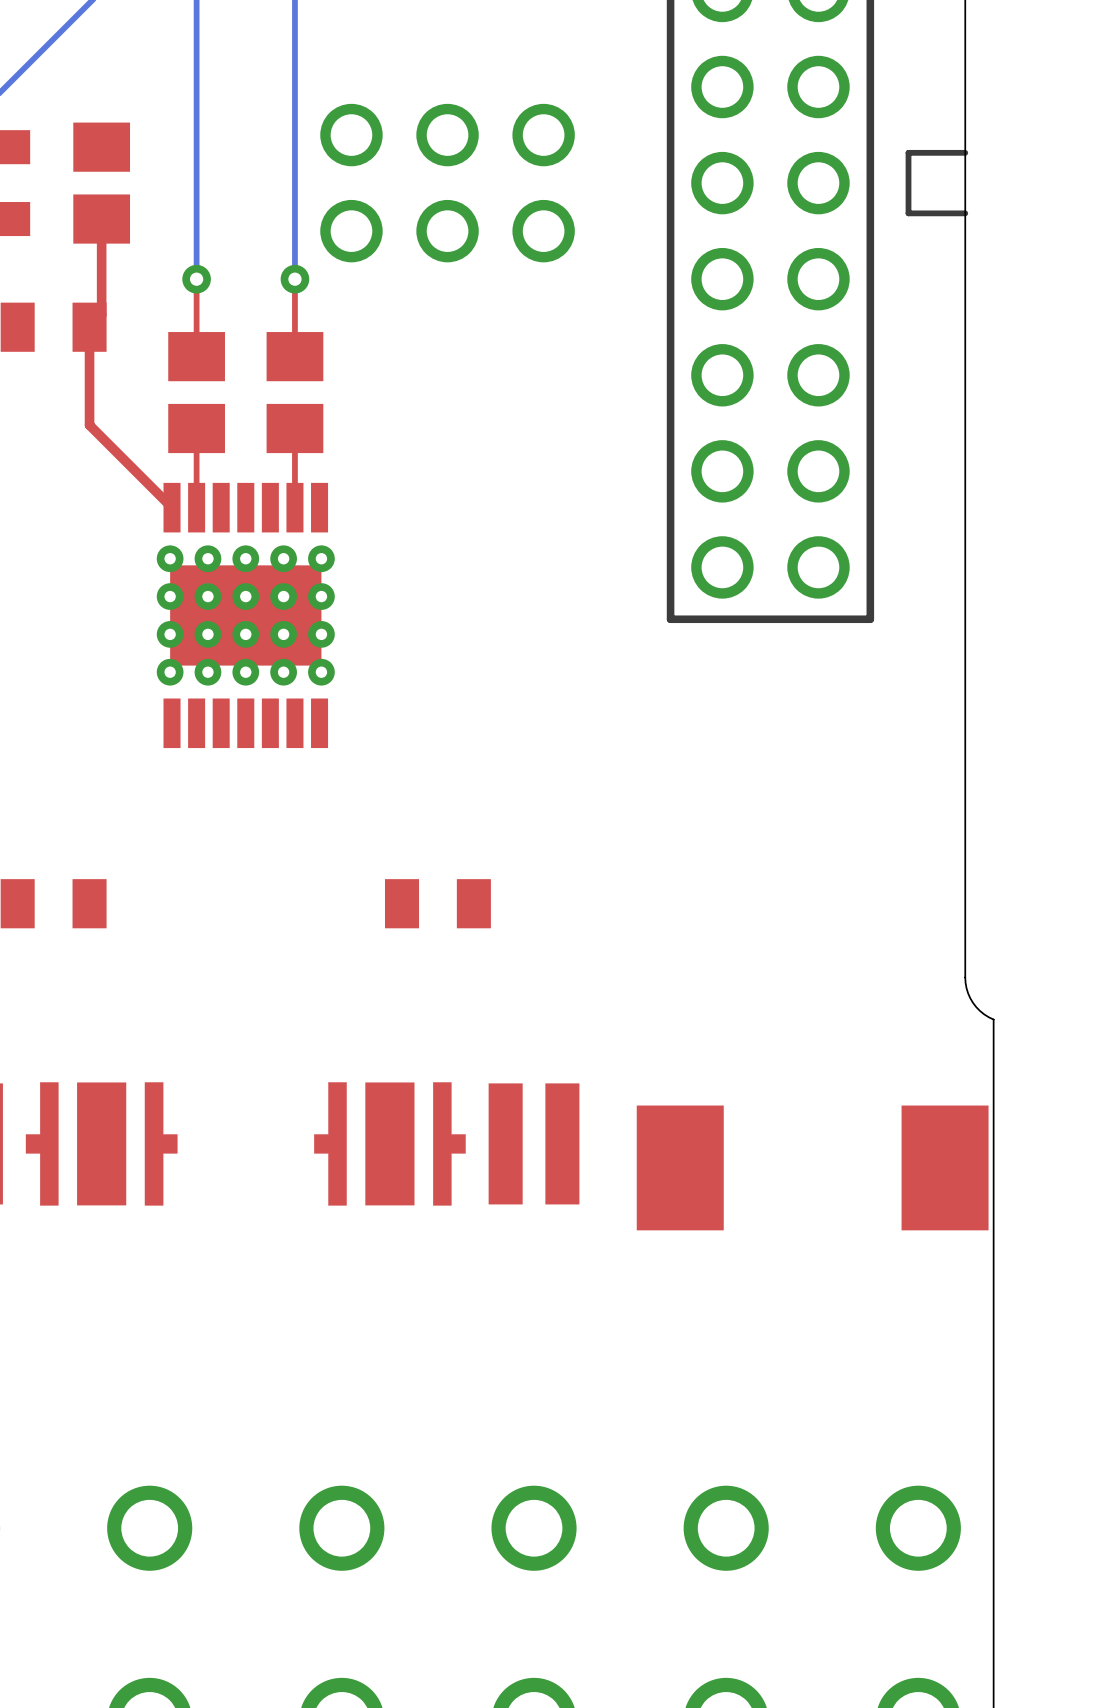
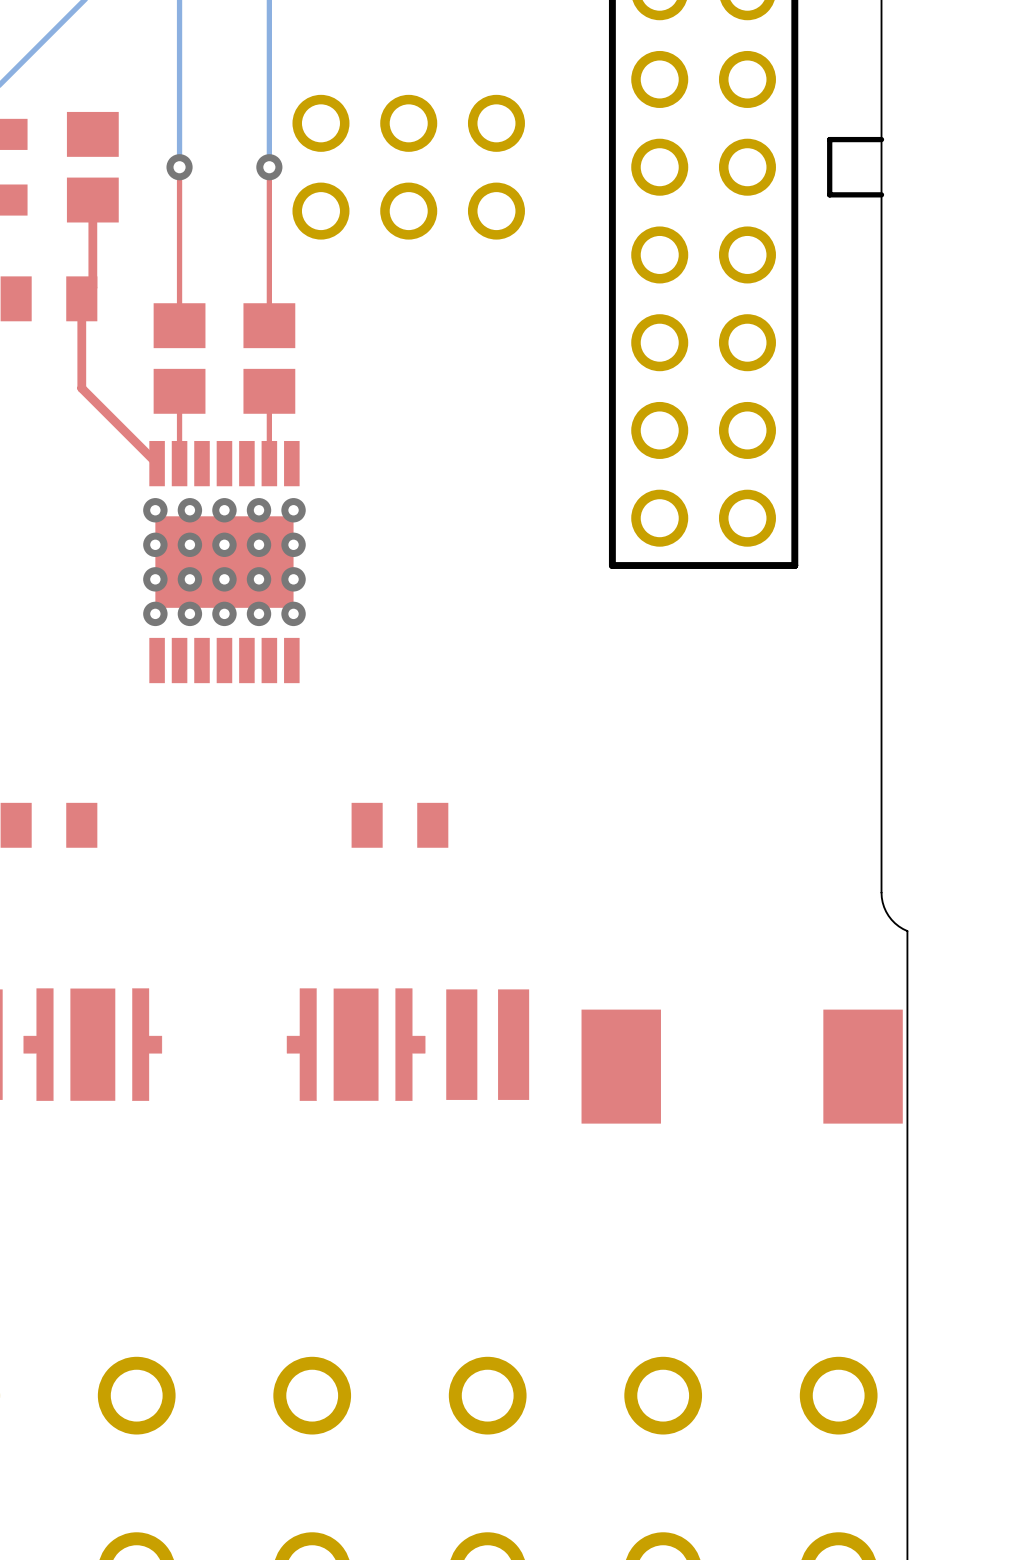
top track: none -> (179, 167) (179, 254)
bottom track: (196, 183) (196, 279) -> none
via: none -> (179, 167)
top track: none -> (269, 167) (269, 254)
bottom track: (294, 183) (294, 279) -> none
via: none -> (269, 167)
via: (196, 279) -> none
via: (294, 279) -> none

